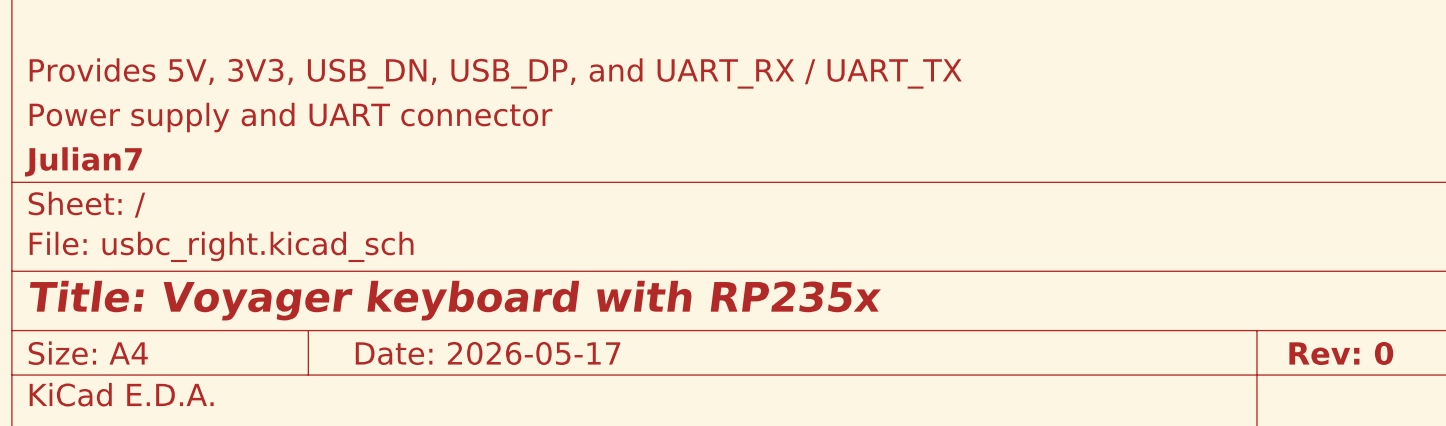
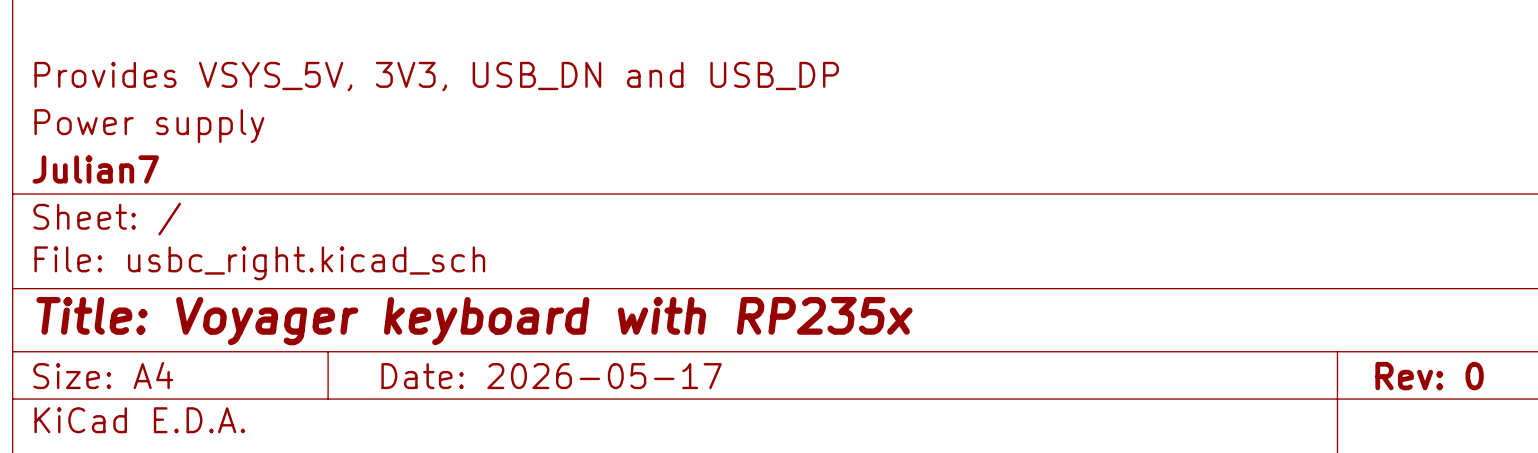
title block: Provides 5V, 3V3, USB_DN, USB_DP, and UART_RX / UART_TX (495, 73) -> Provides VSYS_5V, 3V3, USB_DN and USB_DP (436, 76)
title block: Power supply and UART connector (291, 117) -> Power supply (149, 126)

